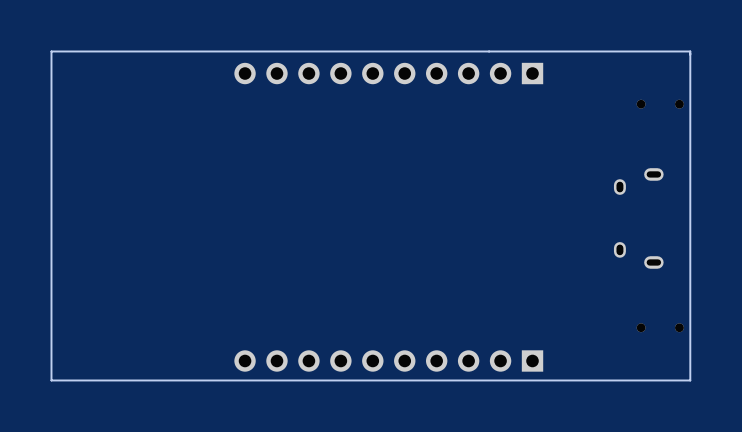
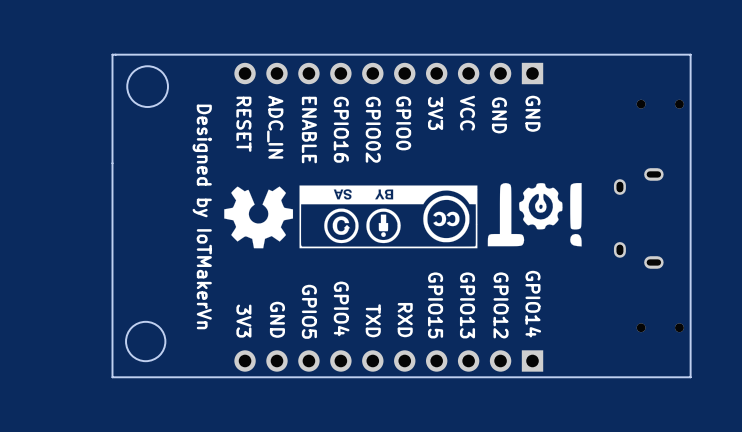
board edge: (690, 51) (690, 380) (51, 380) (51, 51) (690, 51) -> (690, 54) (690, 377) (112, 377) (112, 54) (690, 54)
round board edge: none -> [126, 65, 169, 108]
text: none -> 3V3 (435, 113)
text: none -> VCC (467, 113)
text: none -> GND (532, 113)
text: none -> GND (499, 115)
text: none -> GPIO0 (403, 123)
text: none -> RESET (243, 124)
text: none -> ADC_IN (275, 127)
text: none -> GPIO16 (341, 129)
text: none -> GPIO02 (373, 129)
text: none -> ENABLE (309, 130)
drawing: none -> [224, 183, 582, 249]
text: none -> Designed by IoTMakerVn (202, 216)
text: none -> GPIO14 (533, 304)
text: none -> GPIO15 (435, 305)
text: none -> GPIO13 (467, 305)
text: none -> GPIO12 (501, 305)
text: none -> GPIO4 (341, 308)
text: none -> GPIO5 (309, 311)
text: none -> GND (277, 319)
round board edge: none -> [125, 320, 167, 363]
text: none -> TXD (373, 320)
text: none -> RXD (405, 320)
text: none -> 3V3 (243, 321)

